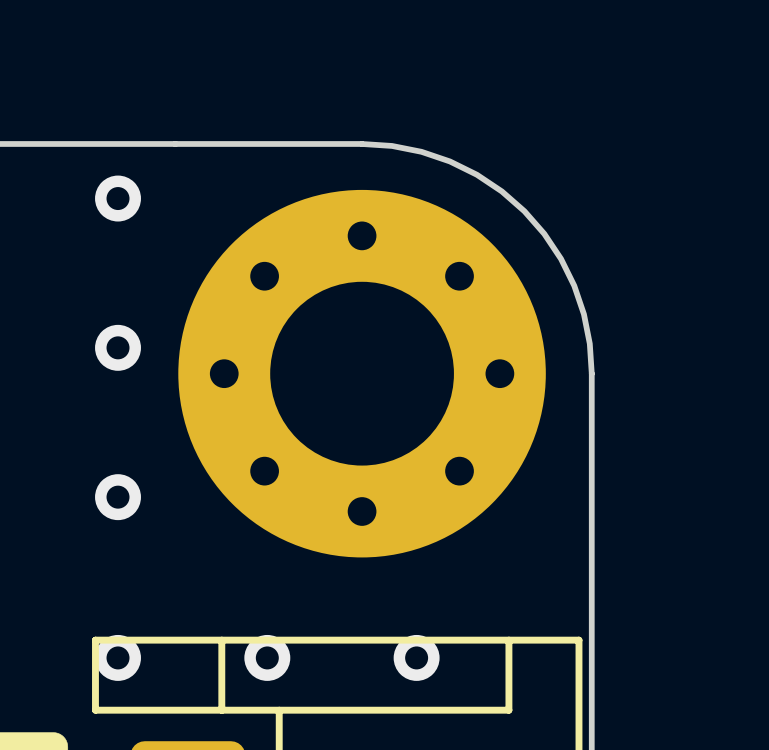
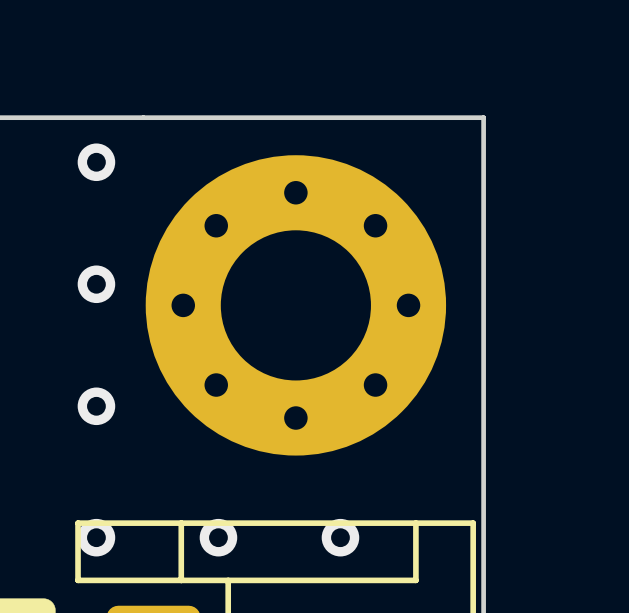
board edge: (362, 143) (392, 145) (421, 151) (449, 161) (476, 174) (501, 191) (524, 211) (544, 233) (560, 258) (574, 285) (583, 314) (589, 343) (591, 373) -> (295, 117) (483, 117) (483, 305)

